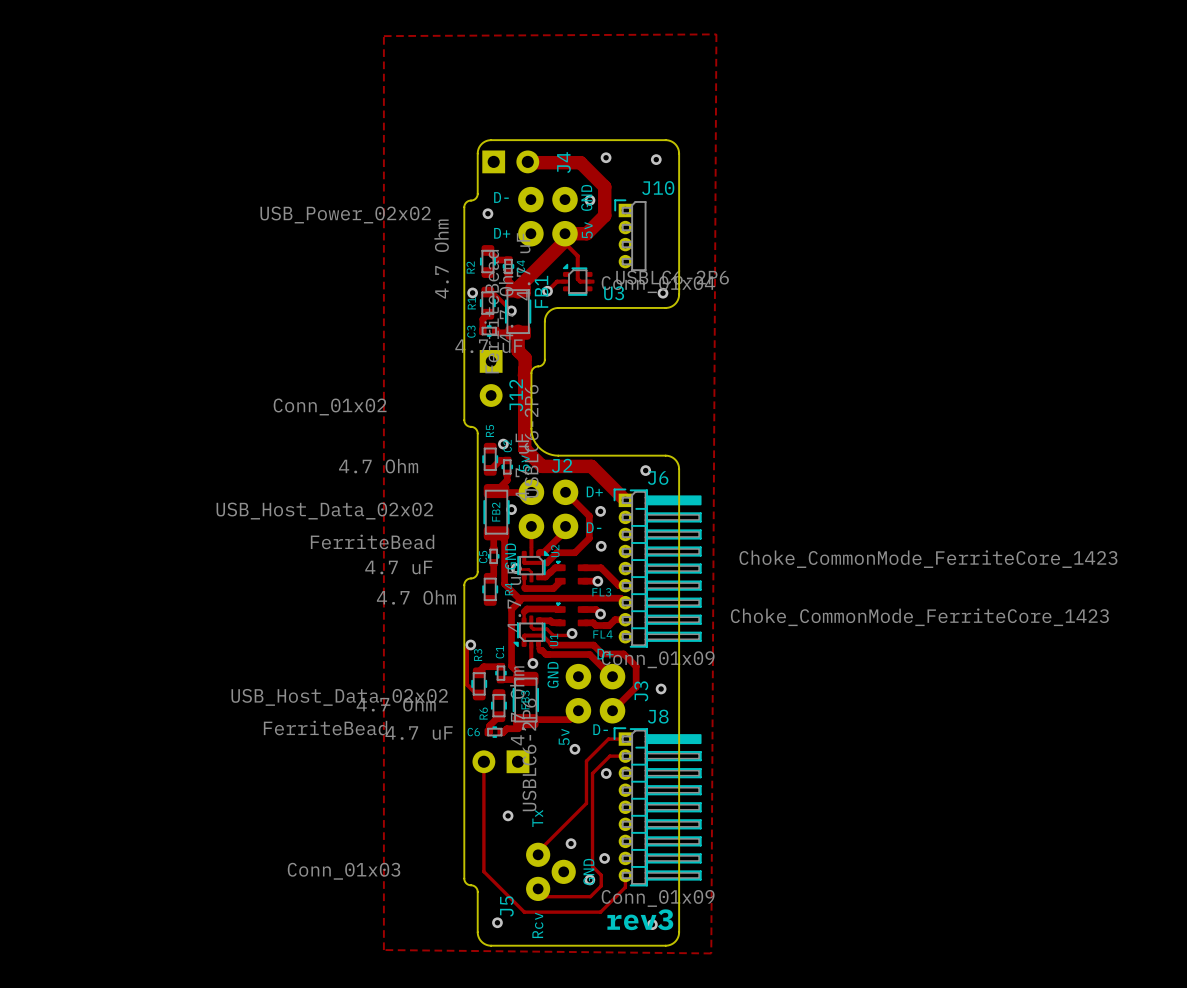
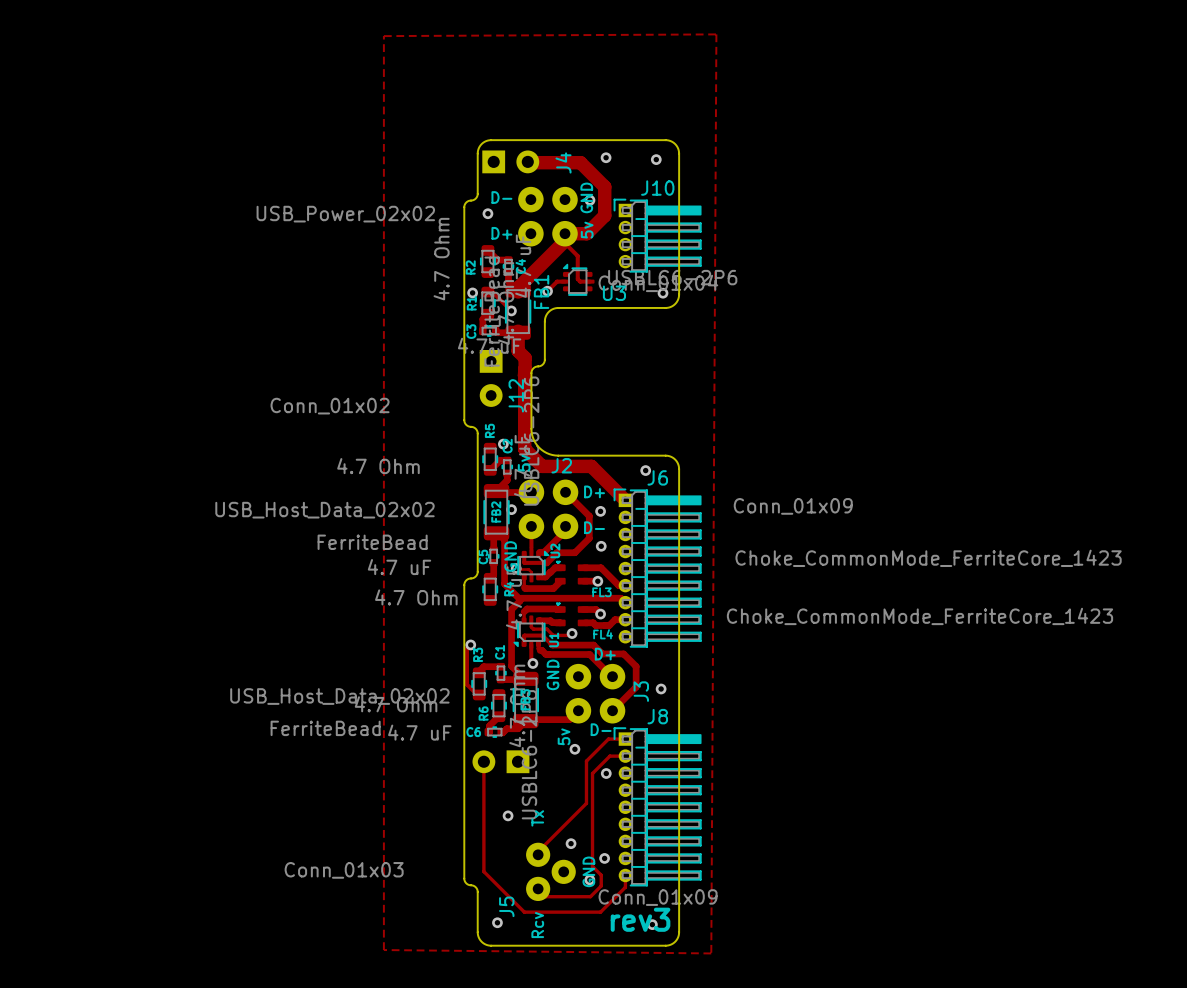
J10 footprint: [614, 199, 647, 271] -> [613, 198, 702, 273]
J6 value position: Conn_01x09 (658, 659) -> Conn_01x09 (793, 506)

